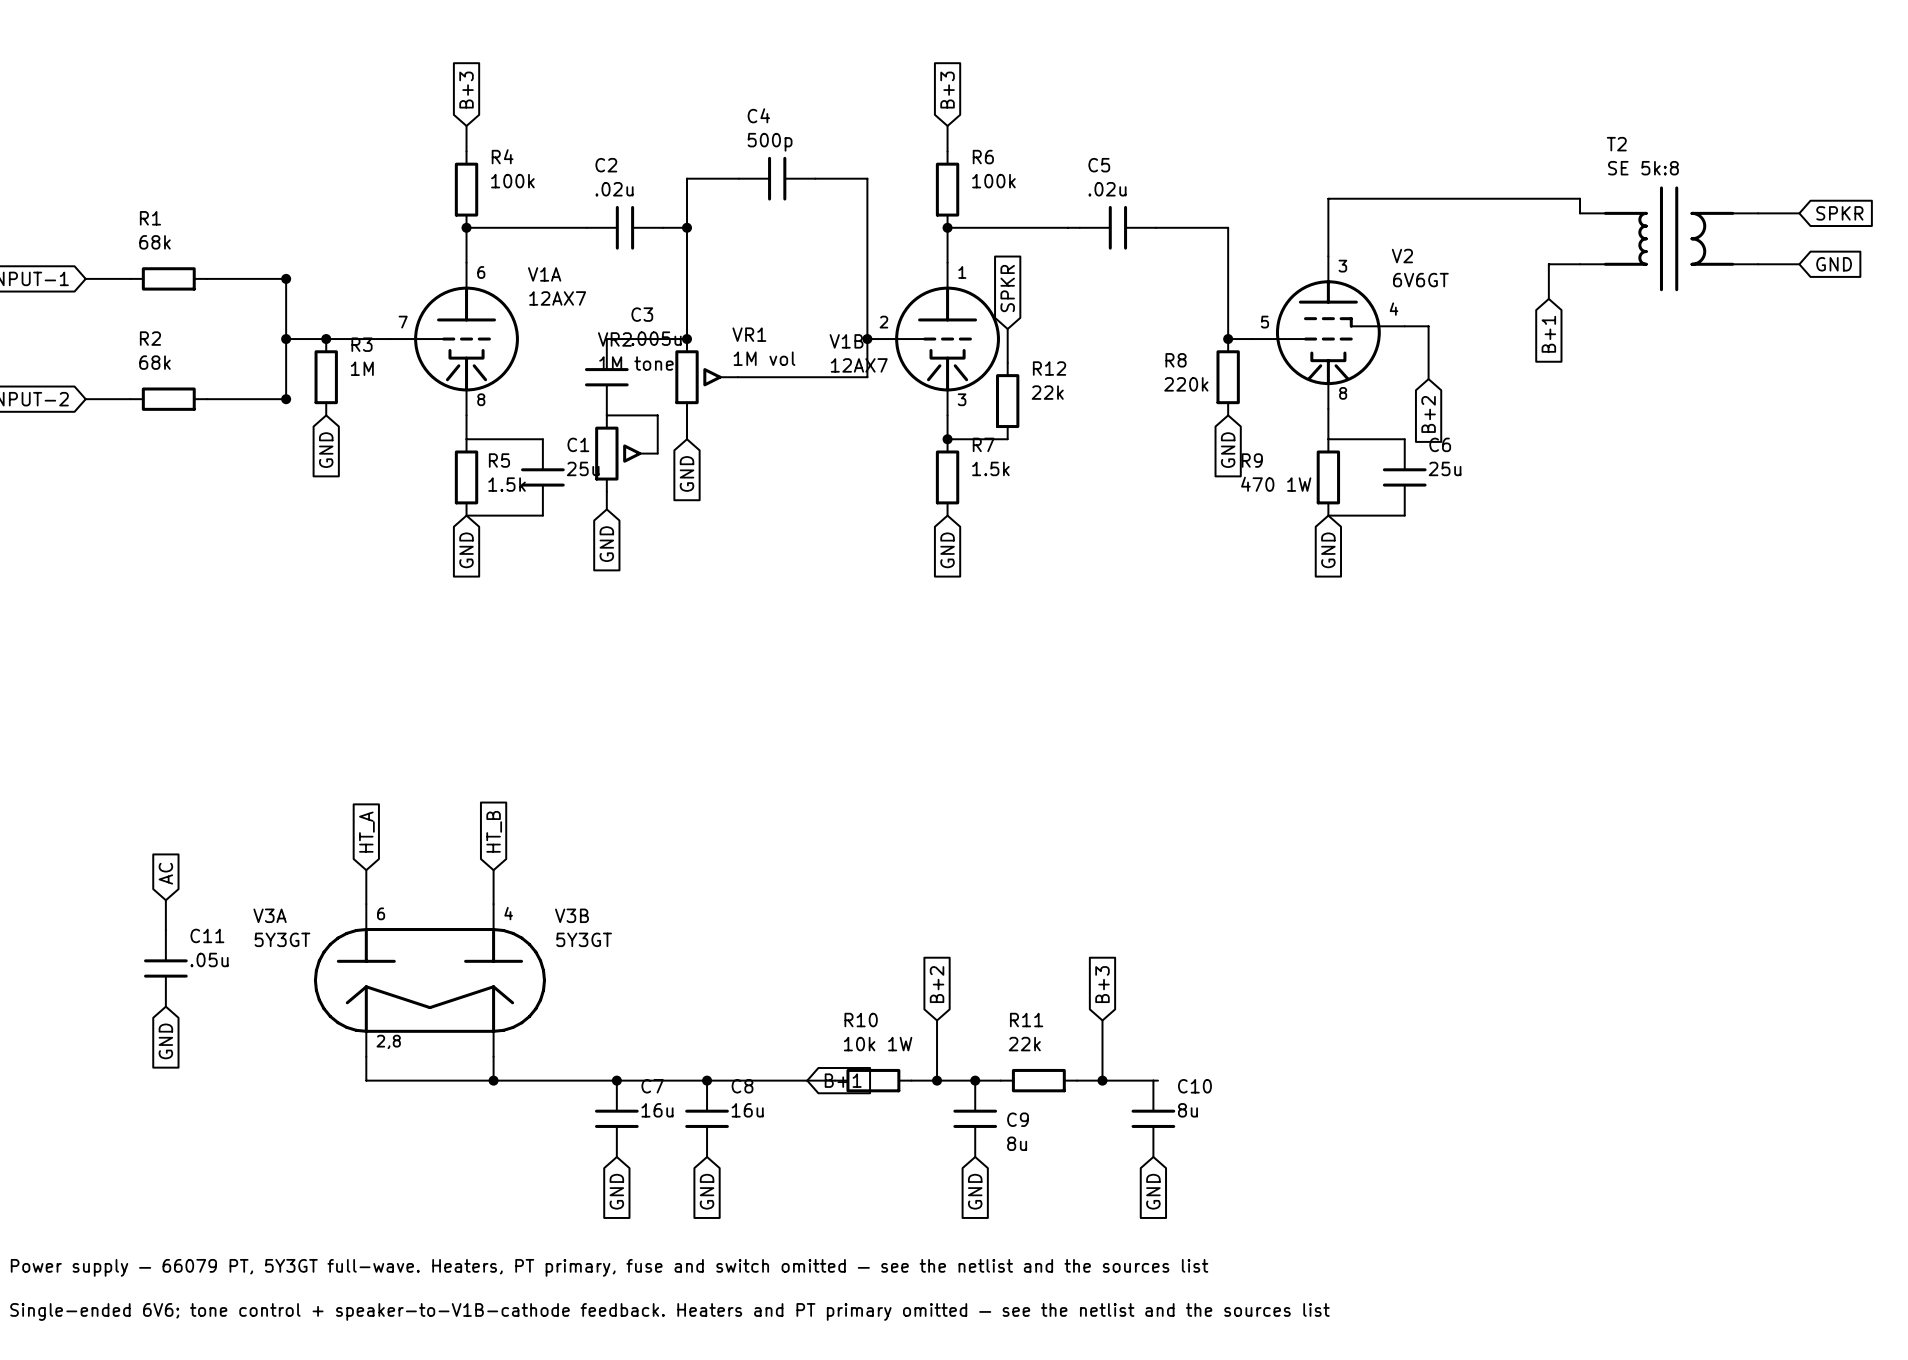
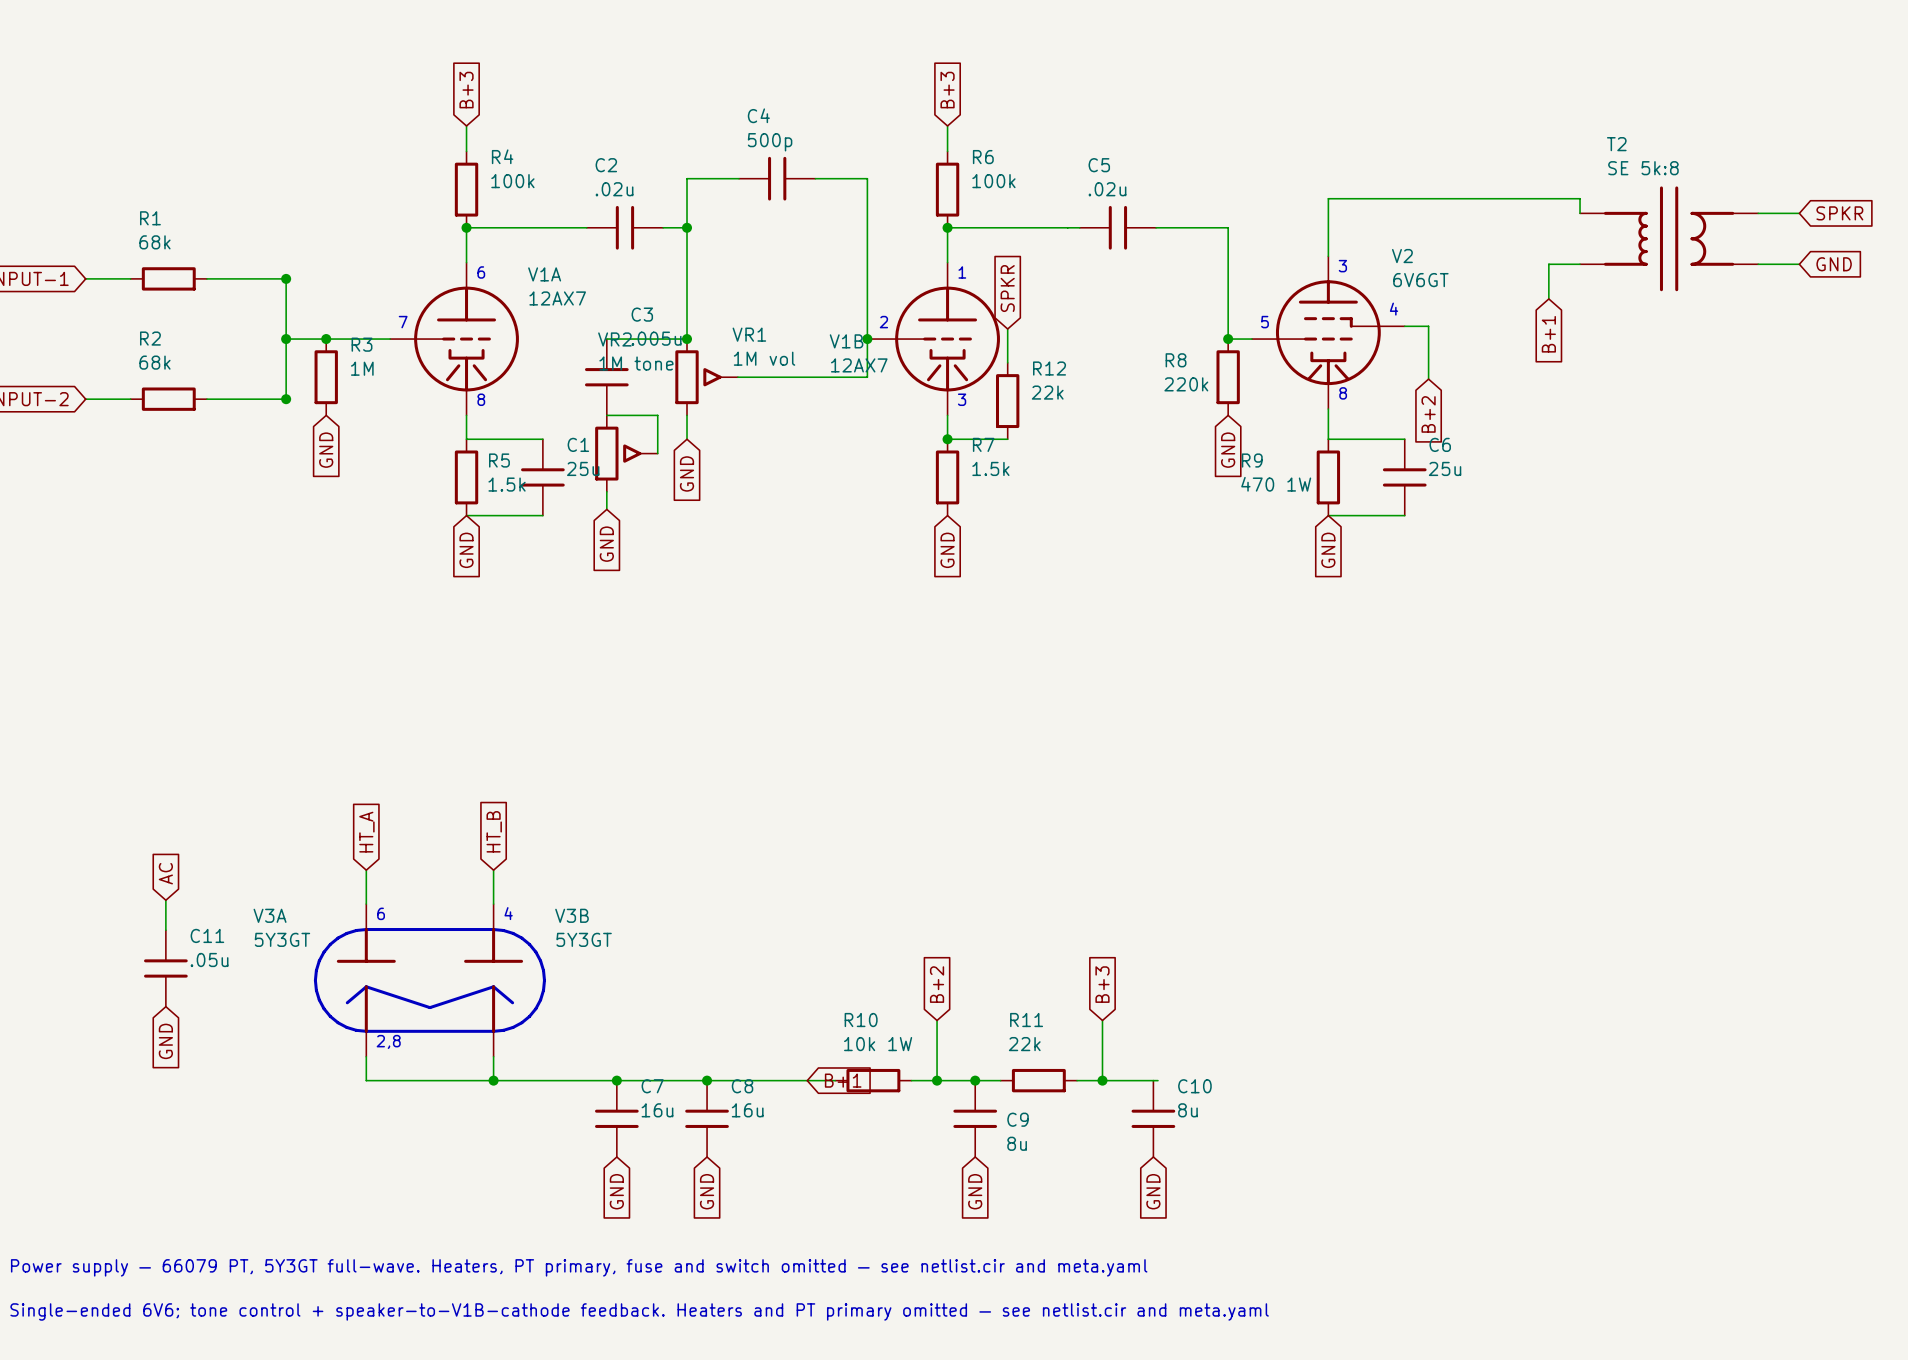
text: Power supply — 66079 PT, 5Y3GT full-wave. Heaters, PT primary, fuse and switch omitted — see the netlist and the sources list (609, 1267) -> Power supply — 66079 PT, 5Y3GT full-wave. Heaters, PT primary, fuse and switch omitted — see netlist.cir and meta.yaml (579, 1267)
text: Single-ended 6V6; tone control + speaker-to-V1B-cathode feedback. Heaters and PT primary omitted — see the netlist and the sources list (669, 1311) -> Single-ended 6V6; tone control + speaker-to-V1B-cathode feedback. Heaters and PT primary omitted — see netlist.cir and meta.yaml (639, 1311)

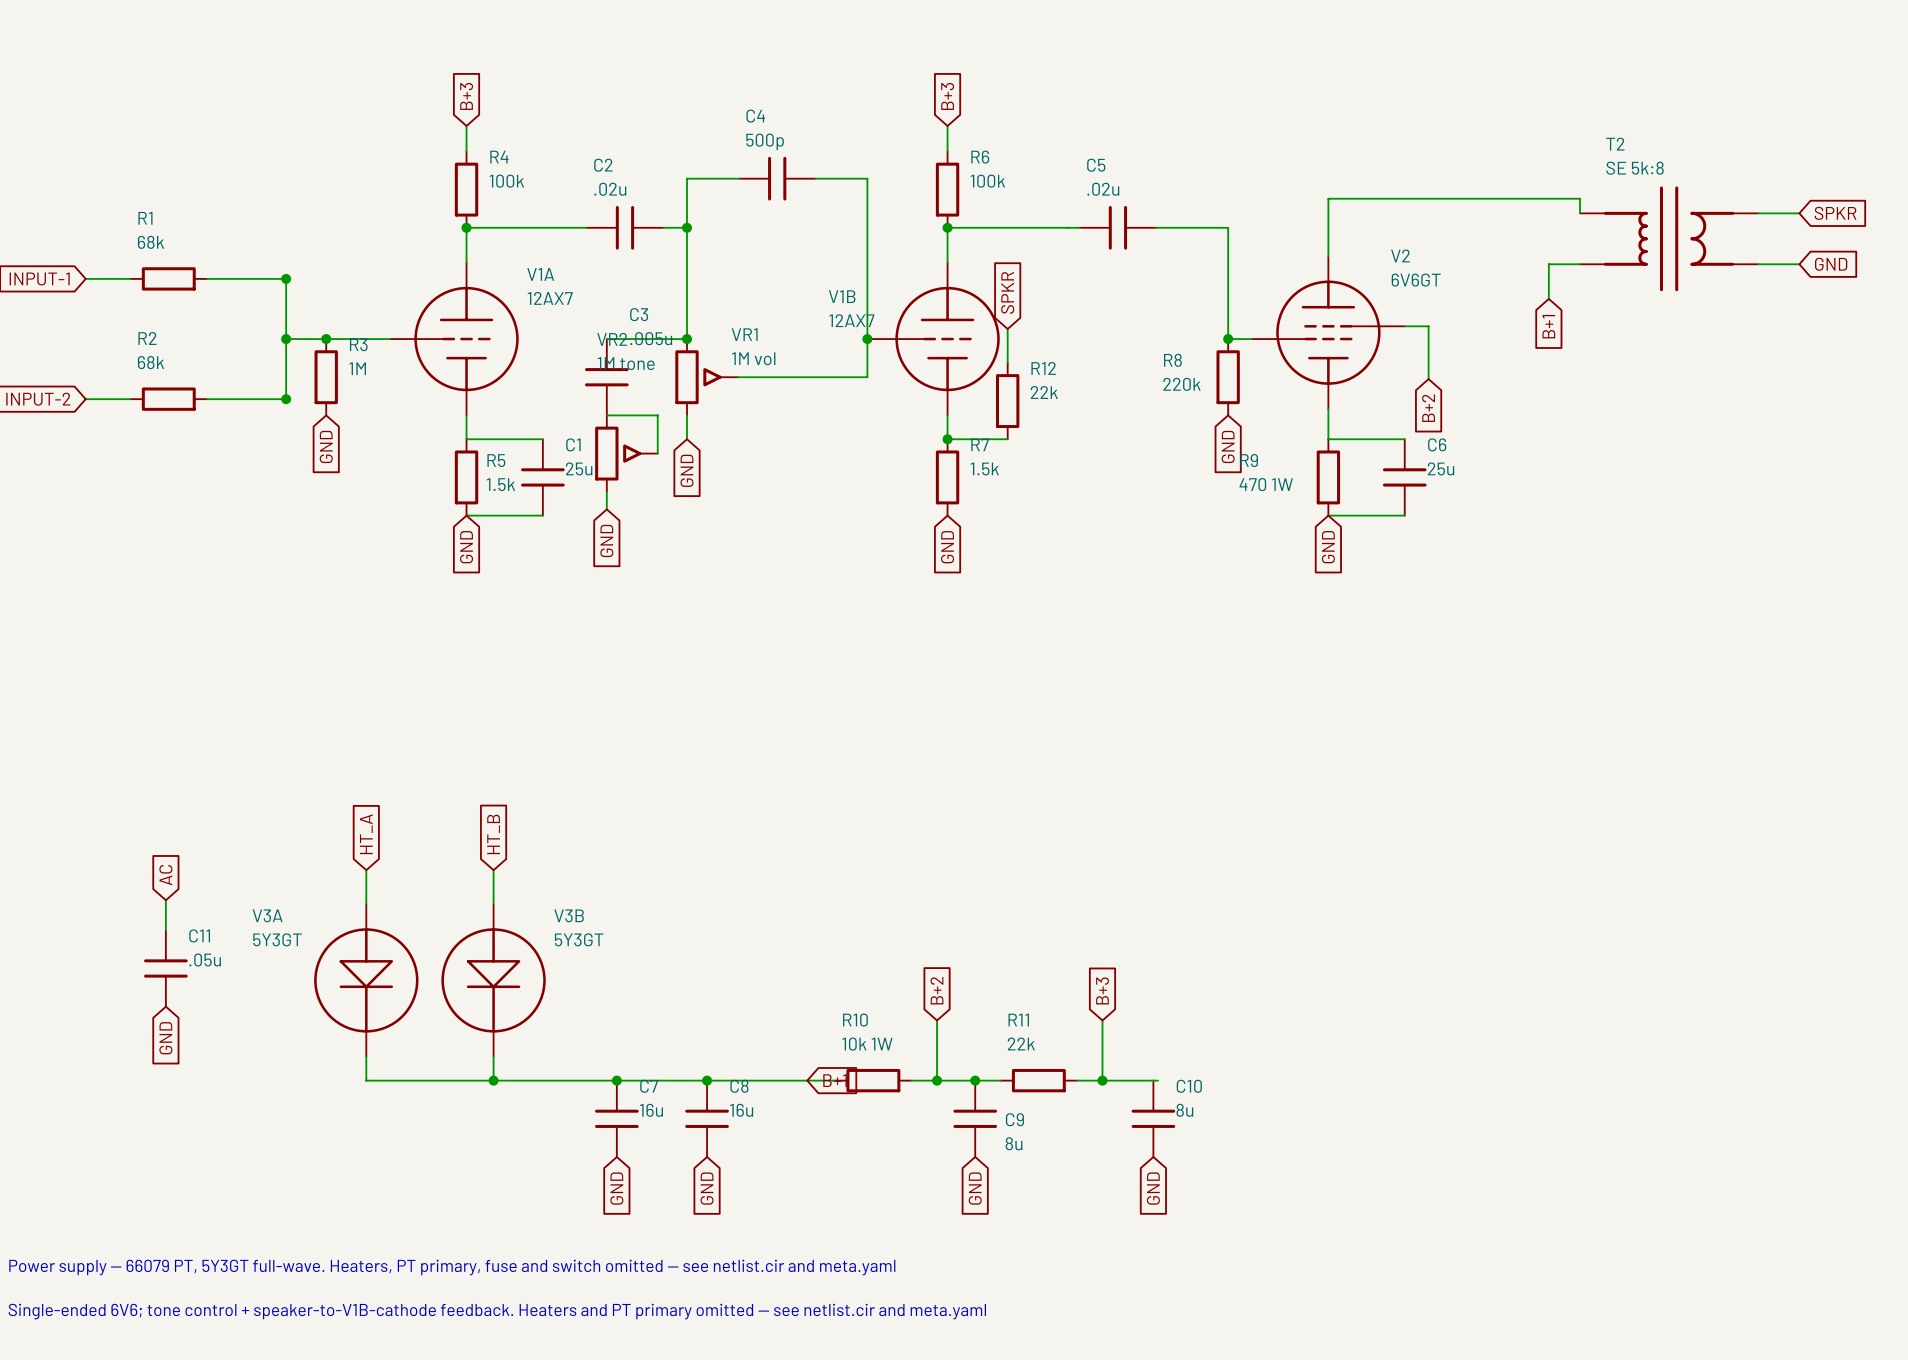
V2 symbol: [1252, 256, 1405, 410] -> [1252, 256, 1405, 410]
V1A symbol: [390, 262, 519, 416] -> [390, 262, 519, 416]
V1B symbol: [871, 262, 1000, 416] -> [871, 262, 1000, 416]
text: 3 (1342, 266) -> none
text: 6 (481, 272) -> none
text: 1 (962, 272) -> none
text: 4 (1394, 309) -> none
text: 7 (403, 322) -> none
text: 2 (883, 322) -> none
text: 5 (1265, 322) -> none
V1B name position: V1B (846, 341) -> V1B (842, 296)
V1B value position: 12AX7 (859, 365) -> 12AX7 (851, 320)
text: 8 (1343, 393) -> none
text: 8 (481, 399) -> none
text: 3 (962, 399) -> none
V3A symbol: [336, 904, 396, 1057] -> [314, 904, 419, 1057]
V3B symbol: [464, 904, 524, 1057] -> [441, 904, 546, 1057]
text: 6 (381, 913) -> none
text: 4 (508, 913) -> none
line: (366, 929) (346, 933) (338, 938) (323, 952) (316, 970) (316, 990) (323, 1008) (338, 1022) (346, 1027) (366, 1031) (503, 1030) (521, 1022) (535, 1008) (540, 999) (544, 980) (540, 960) (529, 944) (513, 933) (493, 929) (366, 929) -> none
line: (347, 1002) (366, 986) (429, 1007) (493, 986) (512, 1002) -> none
text: 2,8 (388, 1041) -> none

